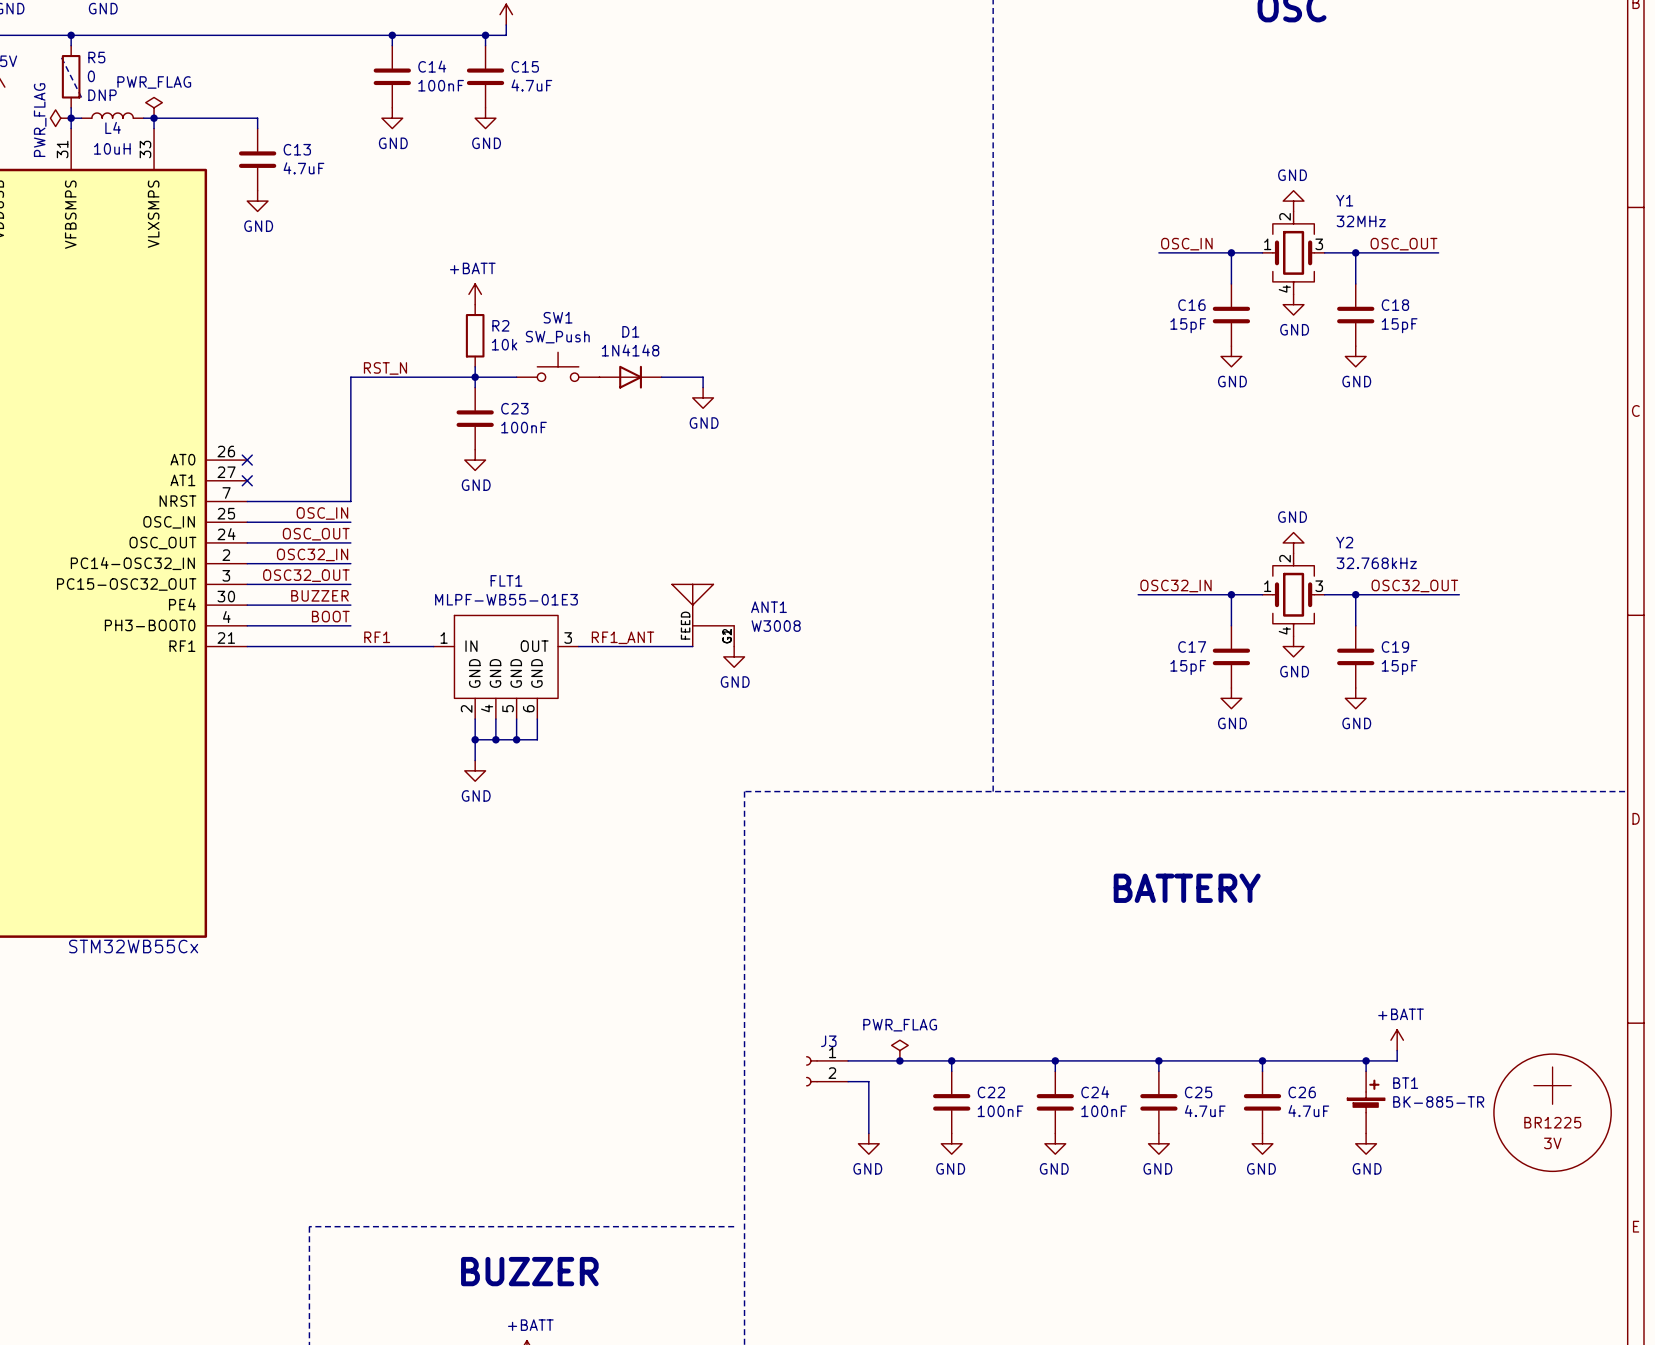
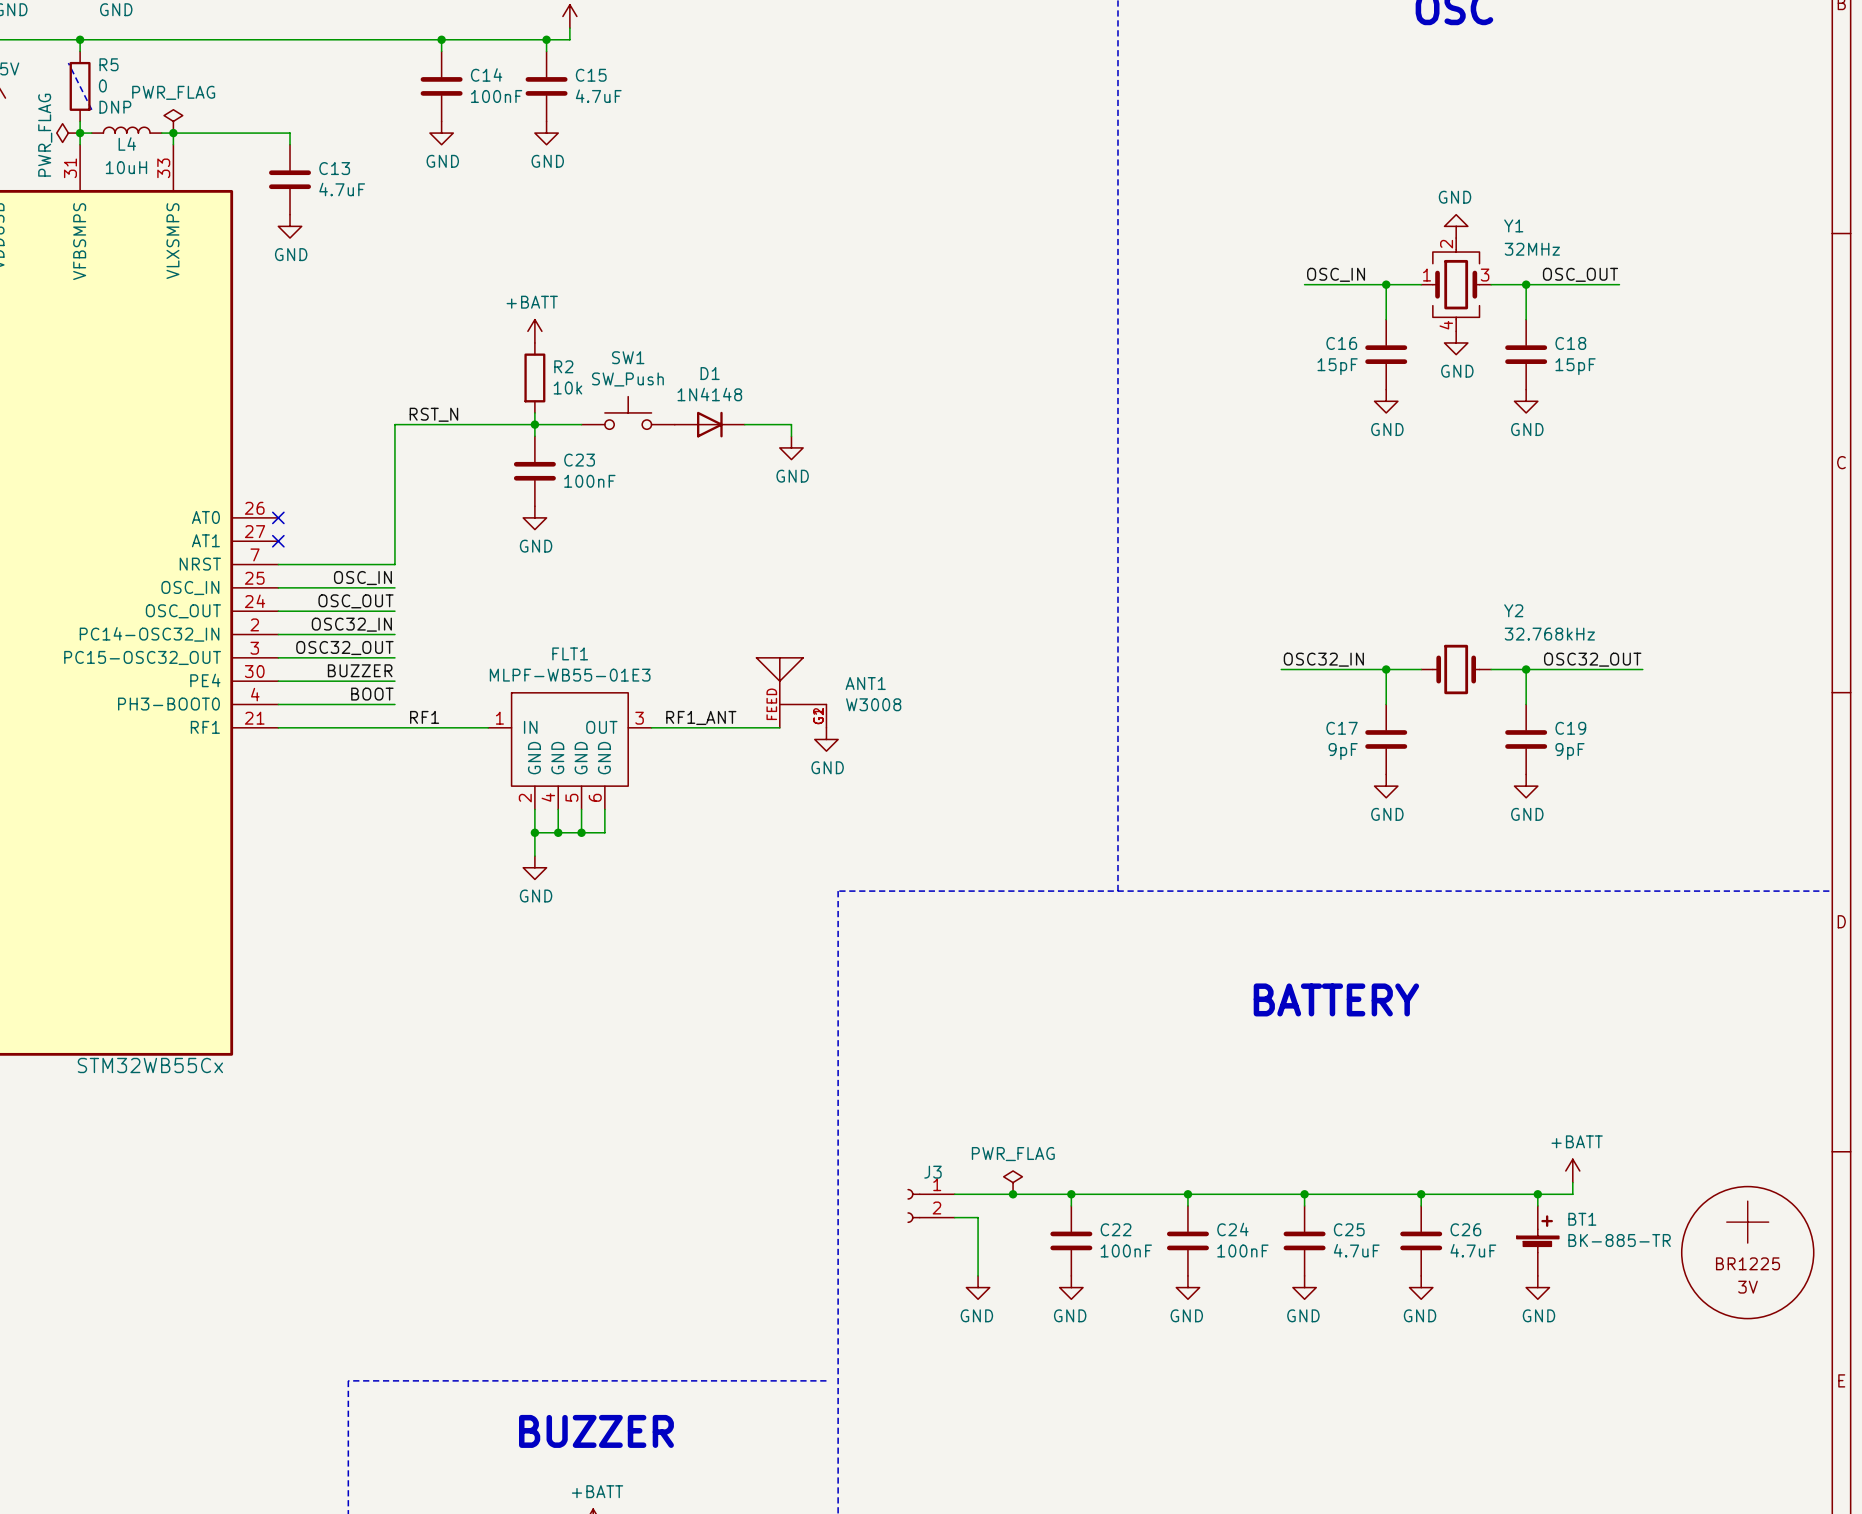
power symbol: GND (1293, 542) -> none
Y2 symbol: [1262, 553, 1325, 637] -> [1421, 644, 1492, 695]
power symbol: GND (1293, 646) -> none
C17 value: 15pF (1188, 667) -> 9pF (1343, 751)
C19 value: 15pF (1399, 667) -> 9pF (1570, 751)

